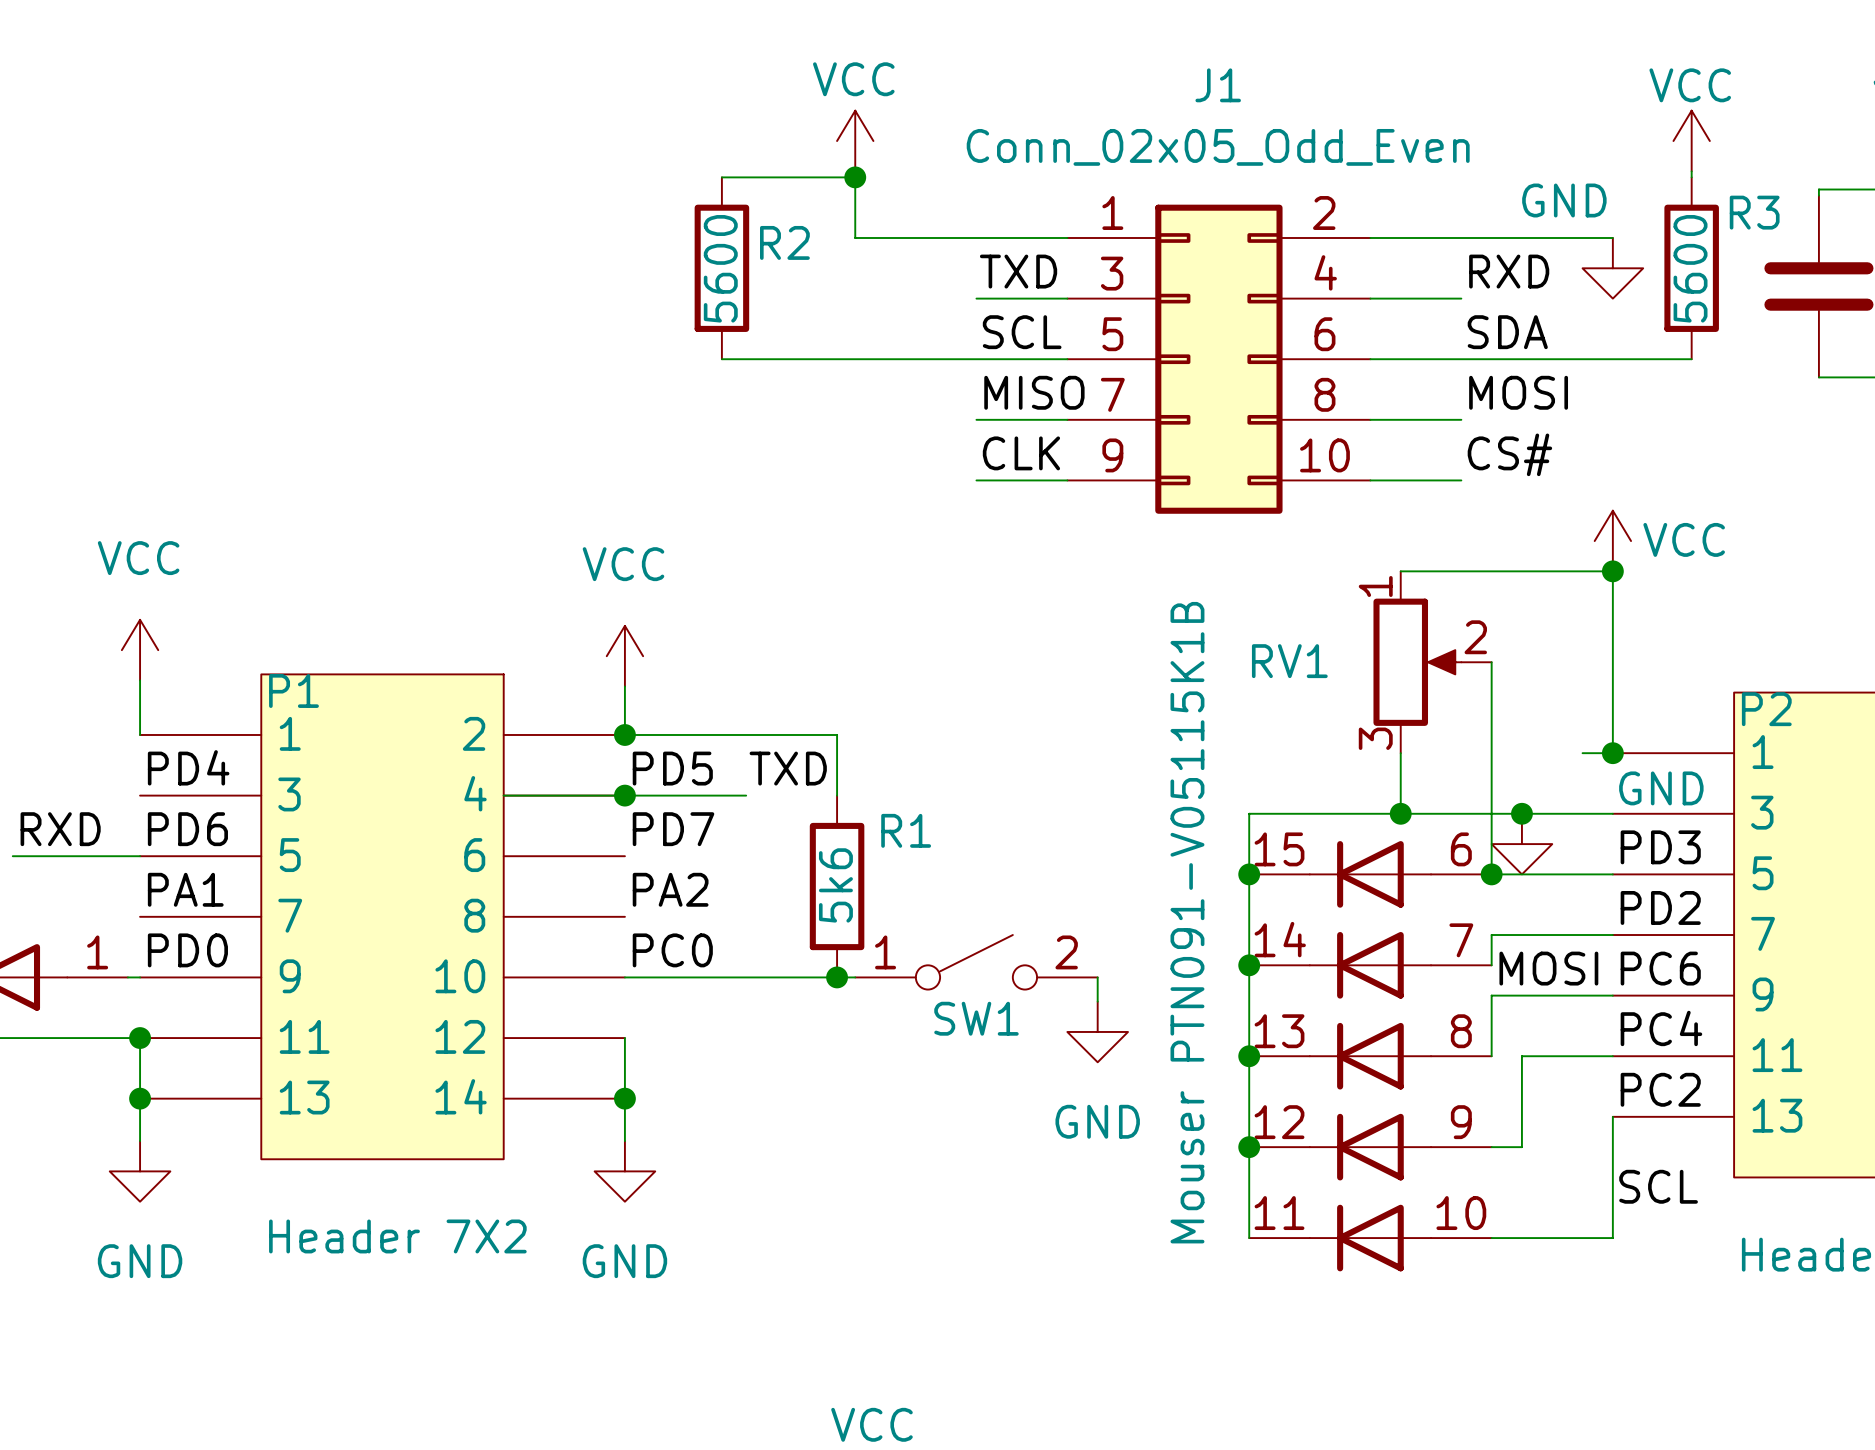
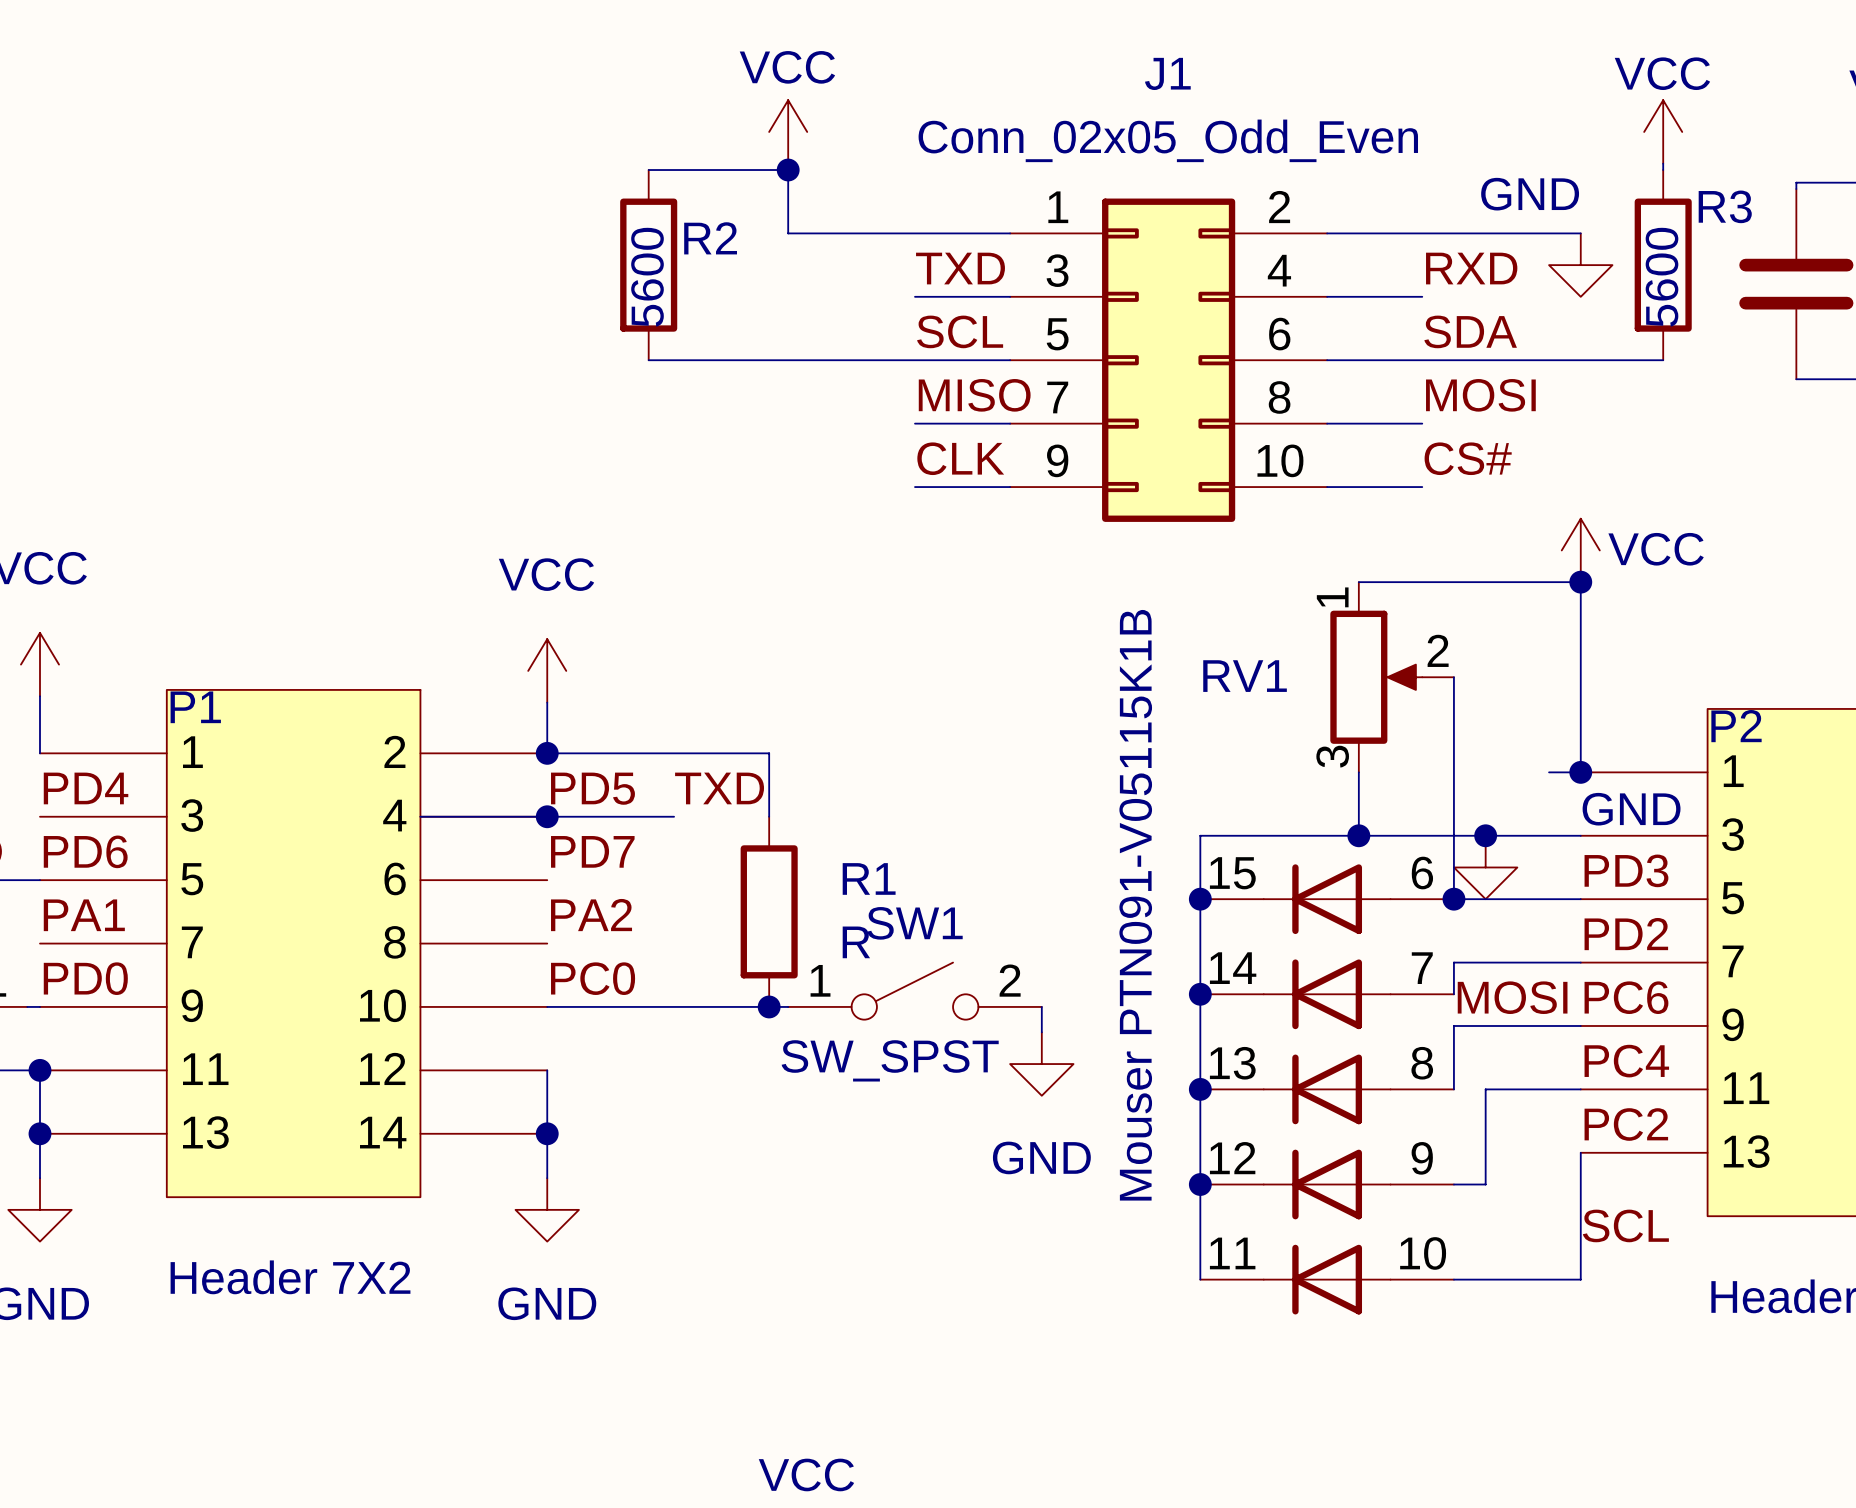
R1 name position: R1 (906, 830) -> R1 (869, 878)
R1 value: 5k6 (835, 885) -> R (856, 942)
SW1 name position: SW1 (976, 1018) -> SW1 (914, 923)
SW1 value: none -> SW_SPST (890, 1060)

